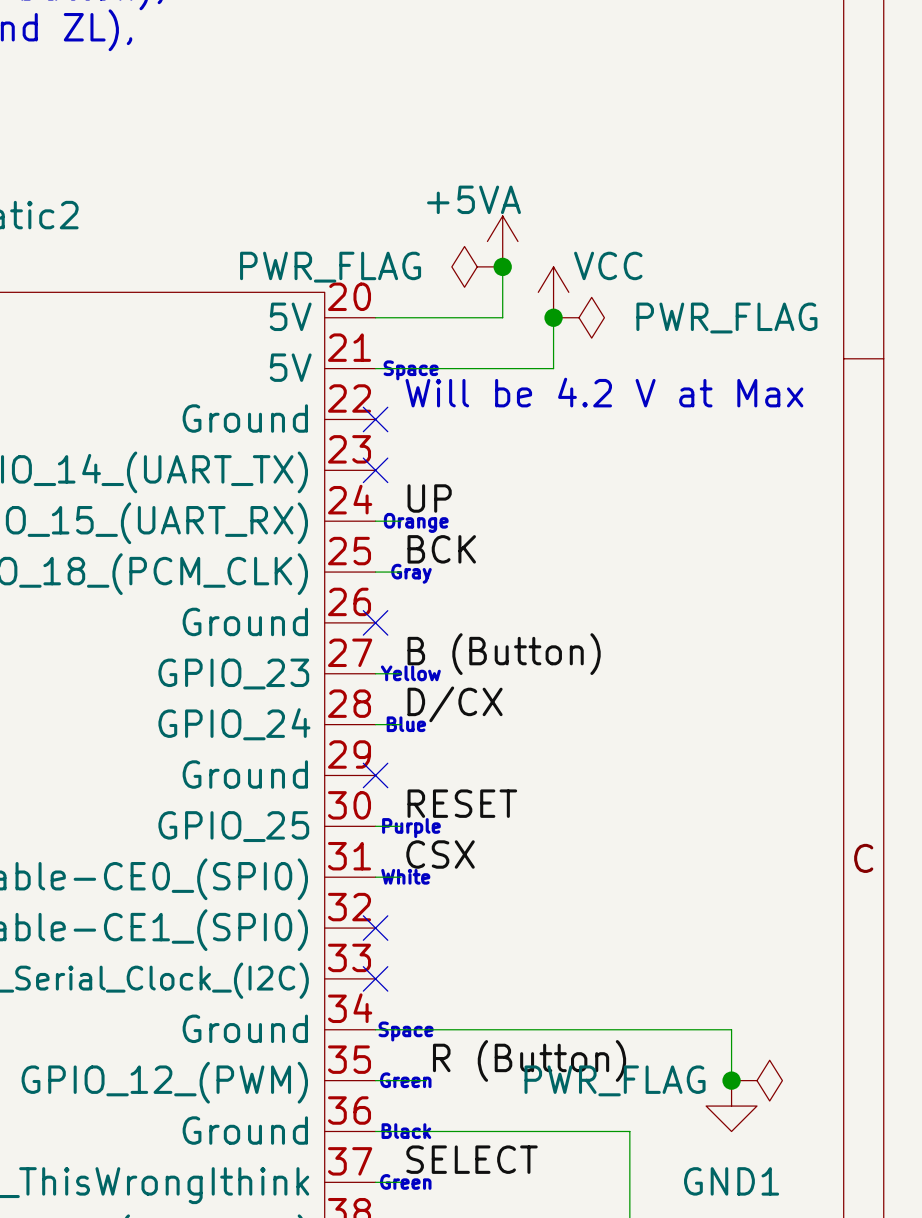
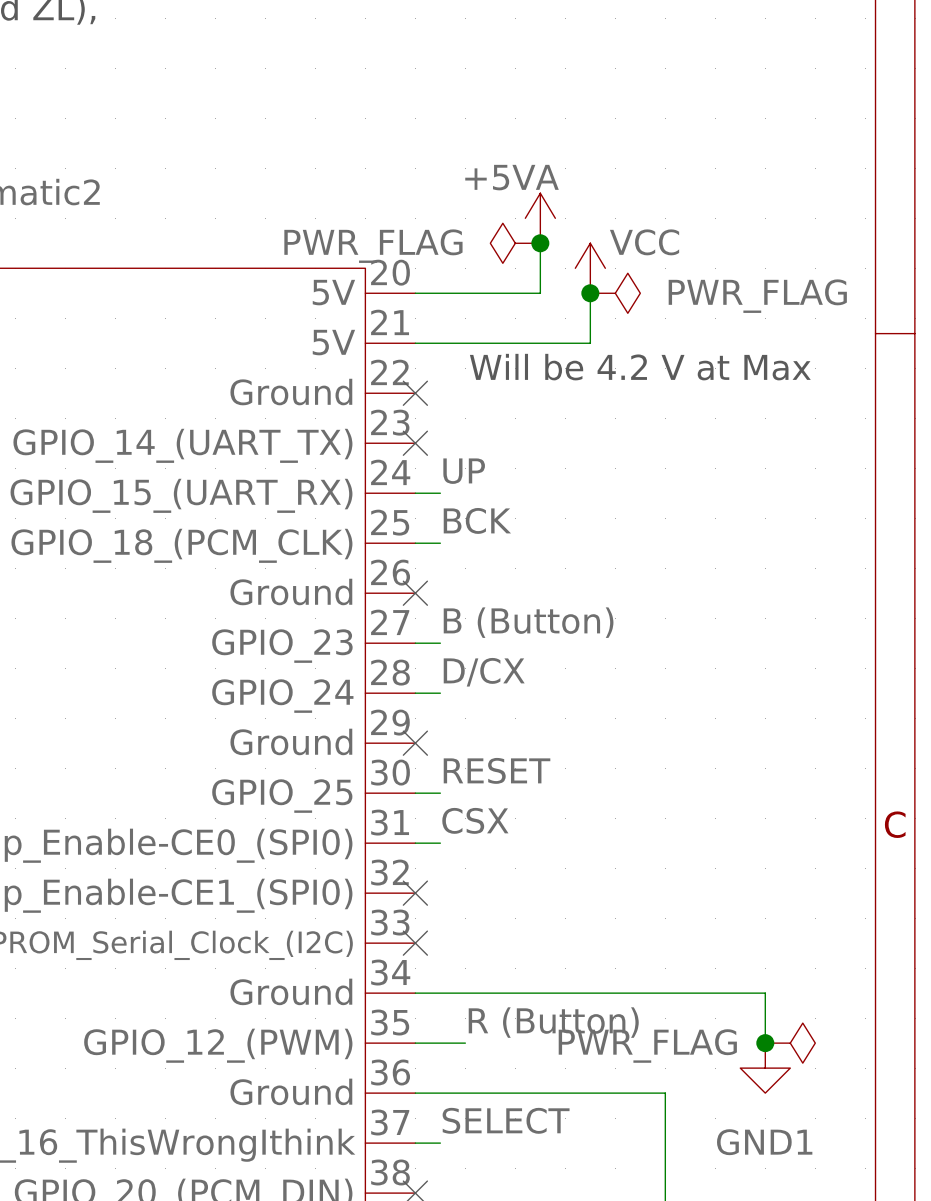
text: Space (411, 370) -> none
text: Orange (416, 522) -> none
text: Gray (411, 573) -> none
text: Yellow (410, 673) -> none
text: Blue (406, 724) -> none
text: Purple (411, 828) -> none
text: White (405, 876) -> none
text: Space (406, 1031) -> none
text: Green (405, 1080) -> none
text: Black (406, 1131) -> none
text: Green (405, 1181) -> none

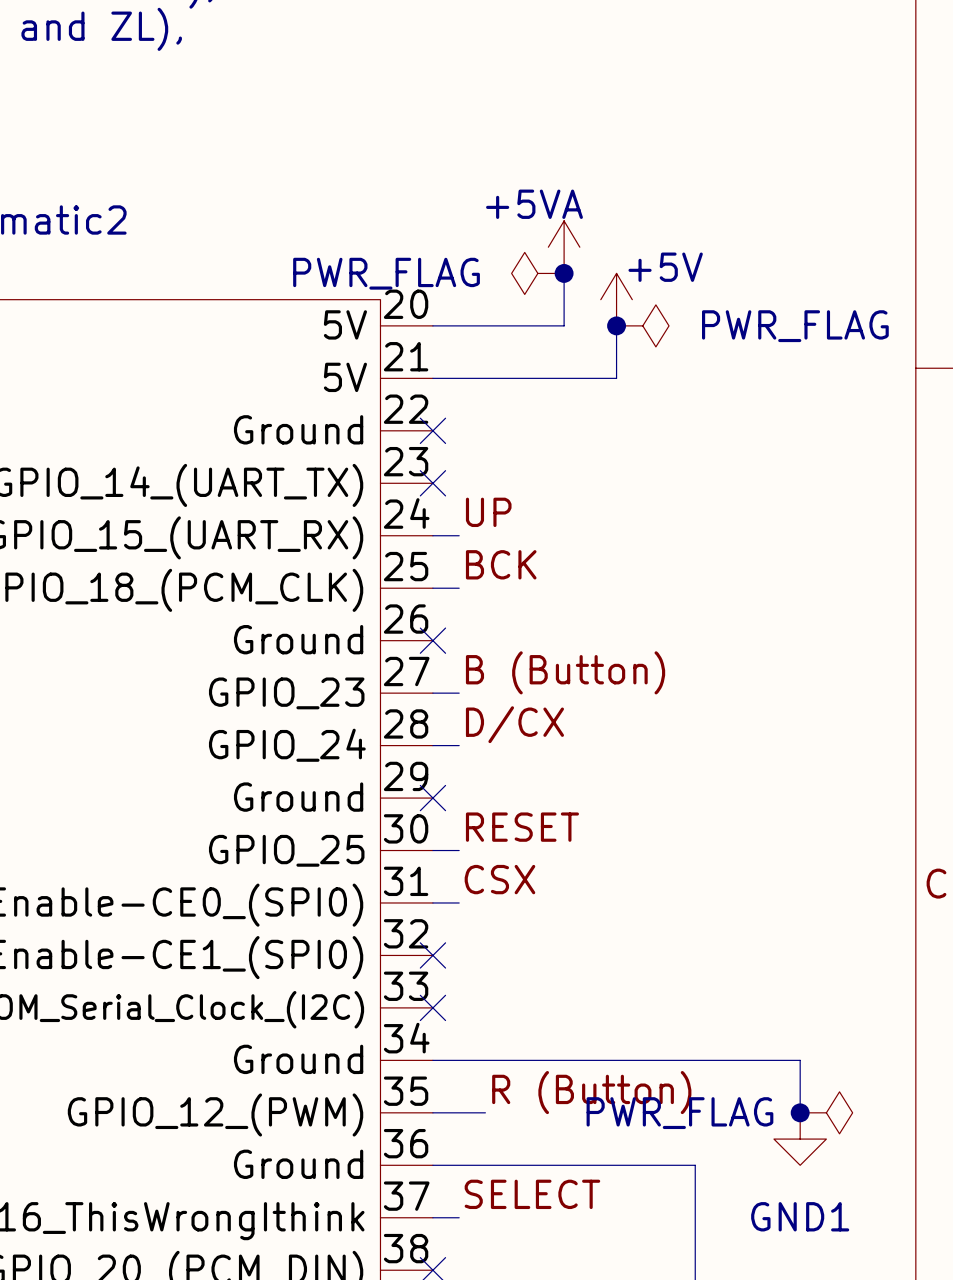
power symbol: VCC (590, 268) -> +5V (616, 299)
text: Will be 4.2 V at Max (640, 367) -> none

